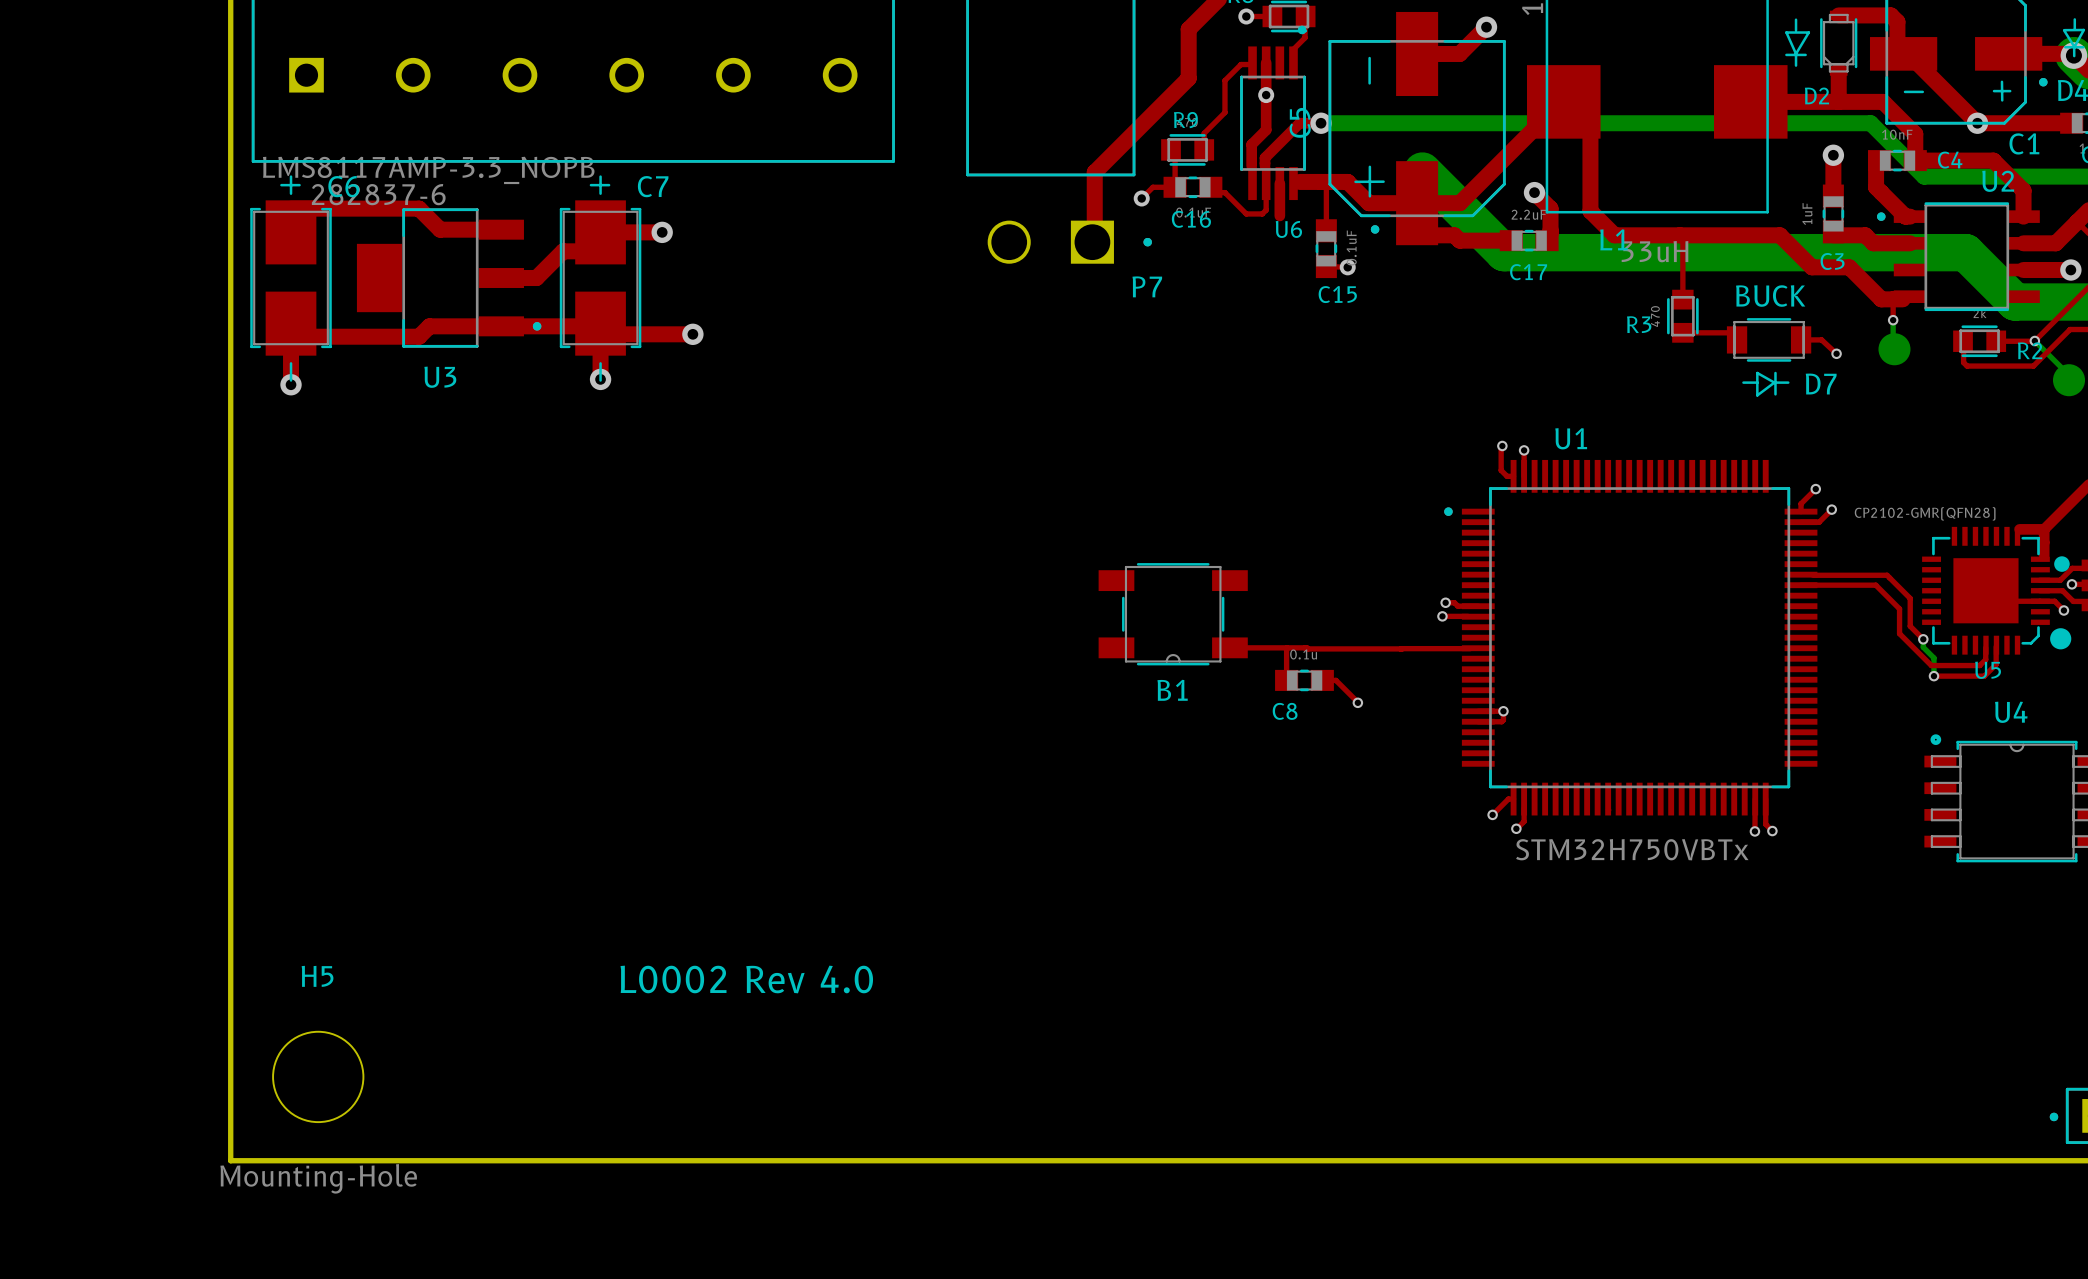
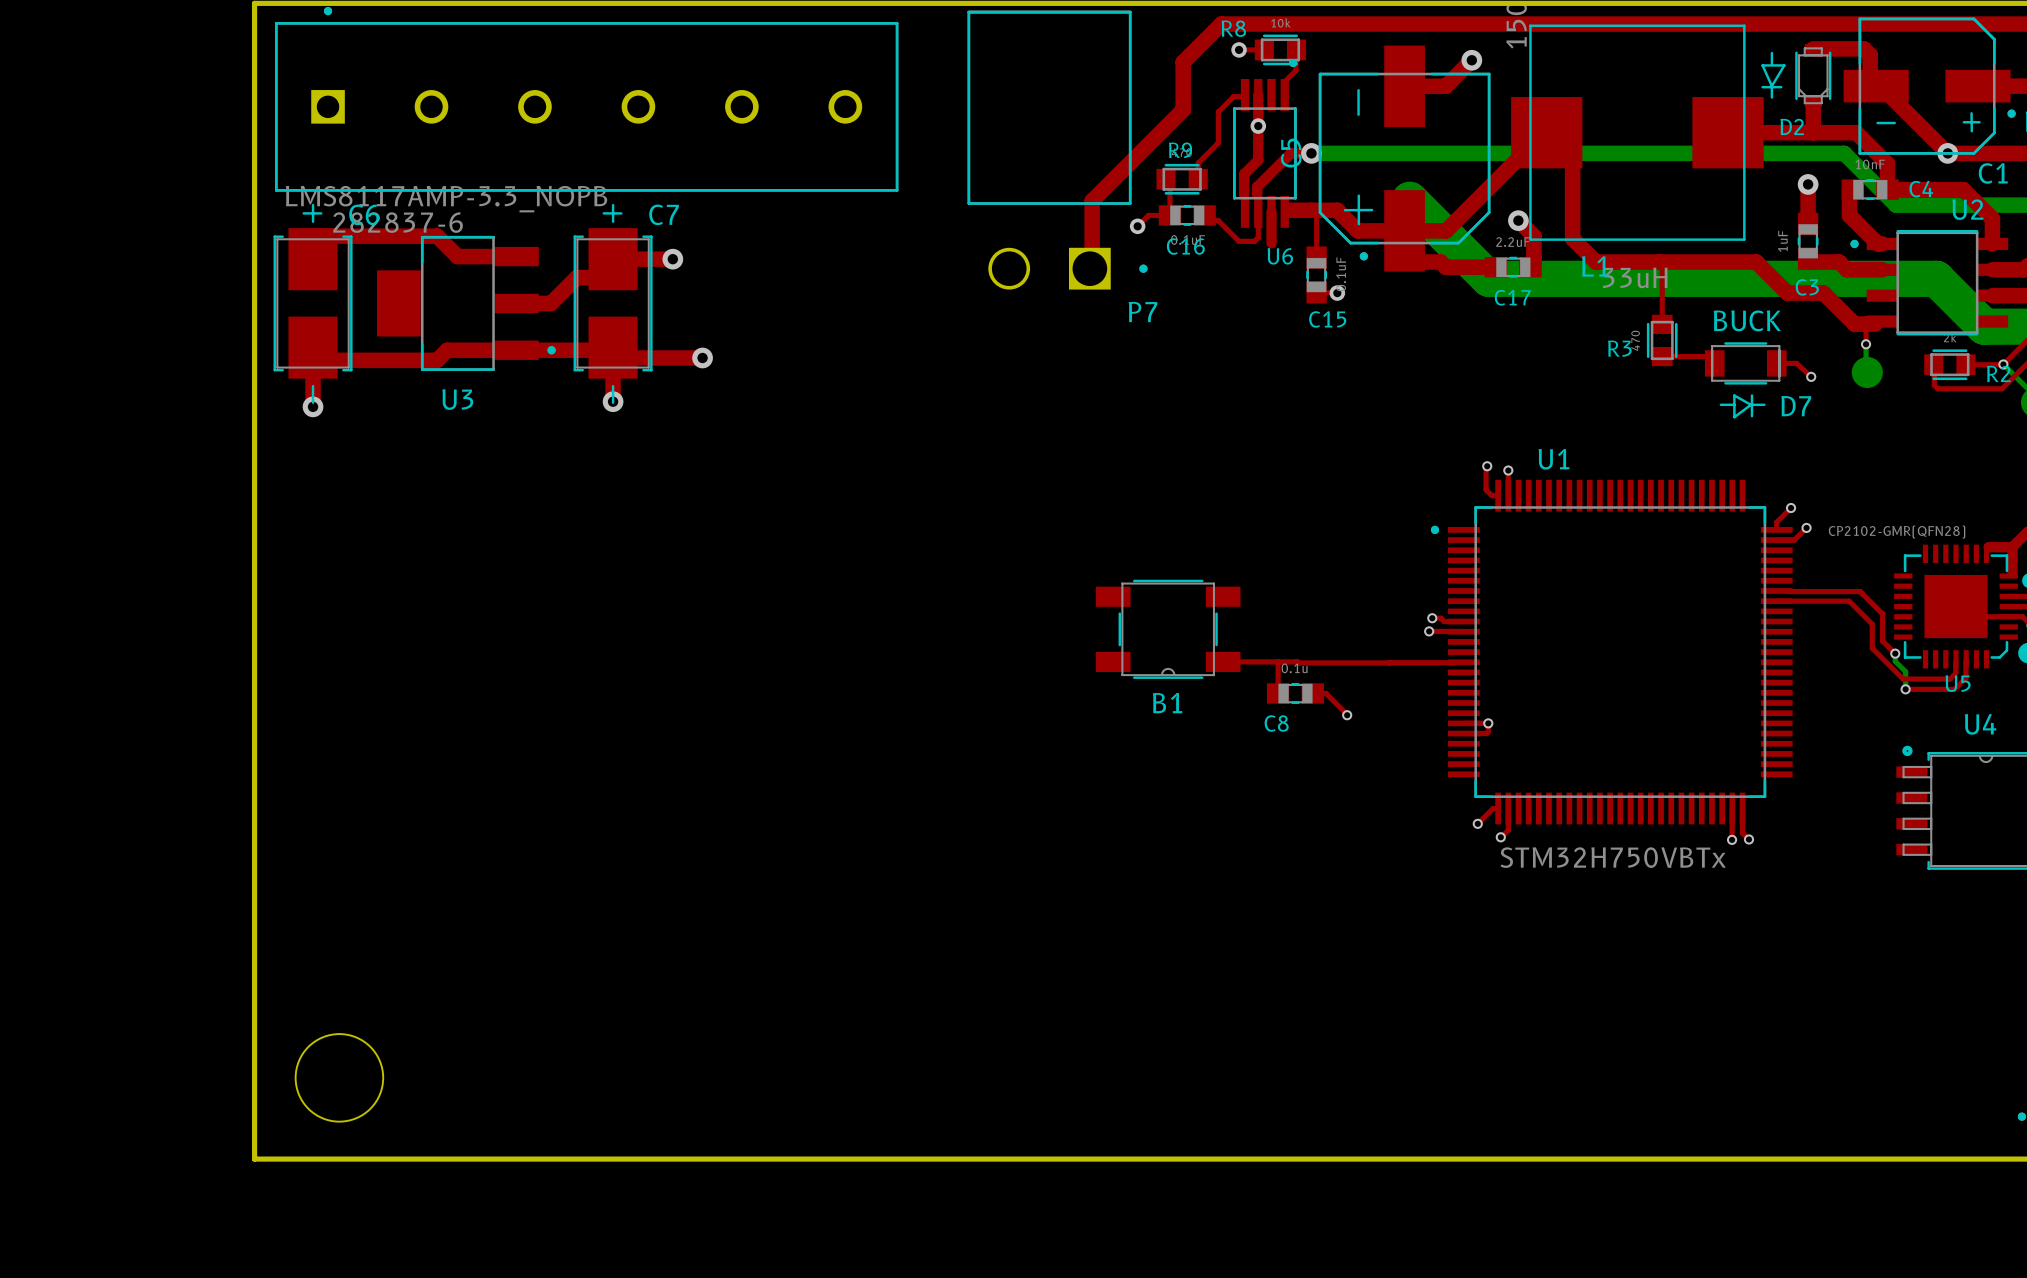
H5 name: H5 (317, 976) -> none
text: L0002 Rev 4.0 (746, 979) -> none
H5 value: Mounting-Hole (318, 1178) -> none

